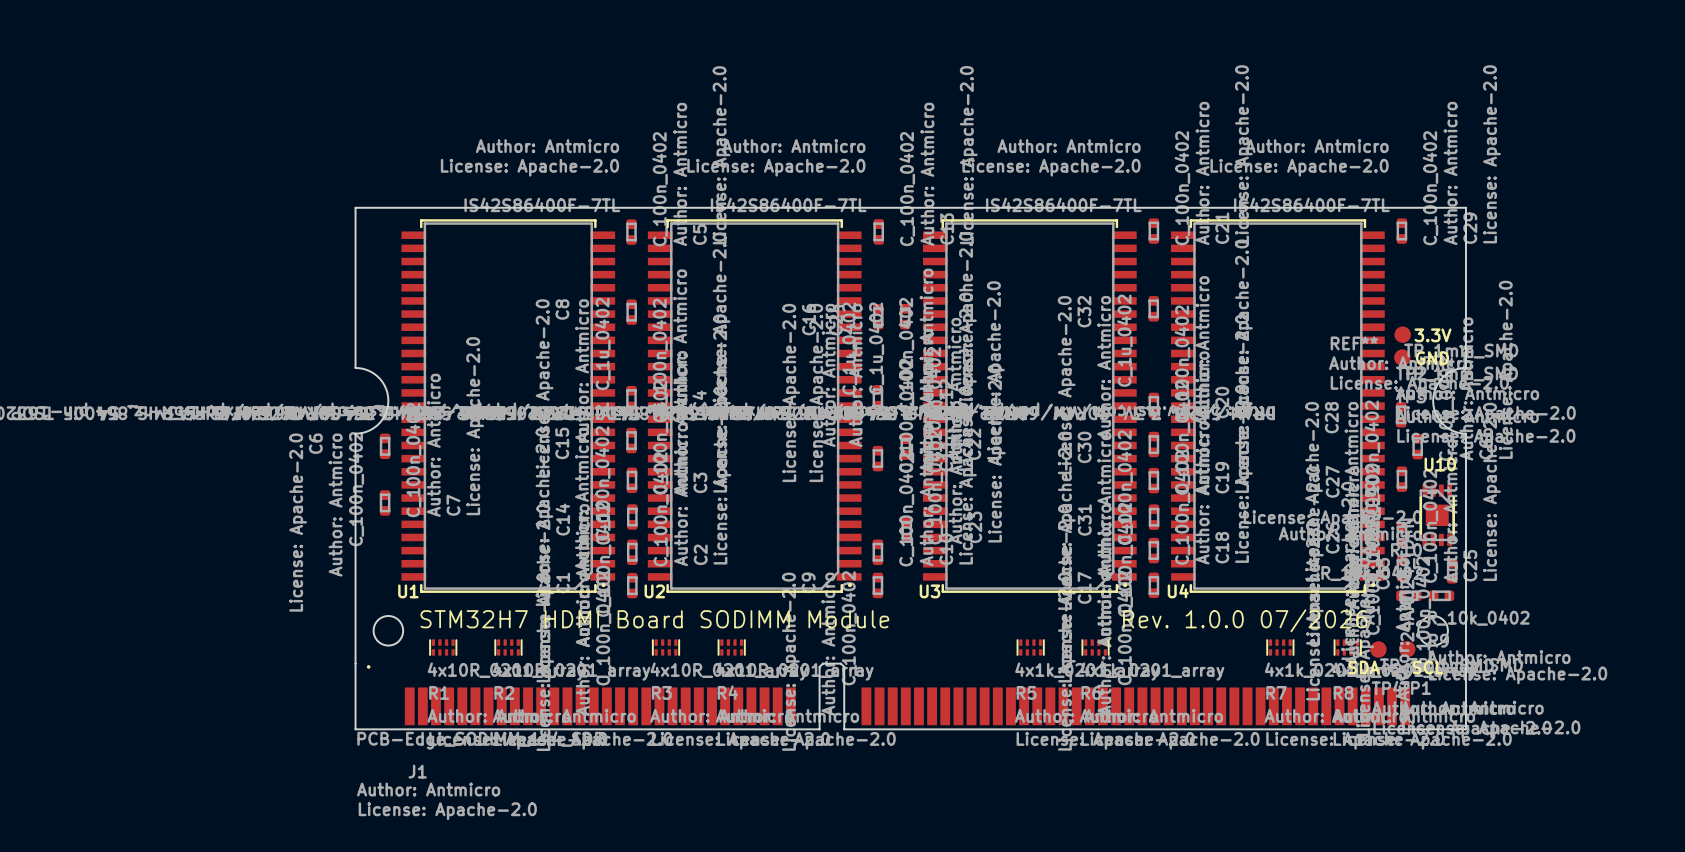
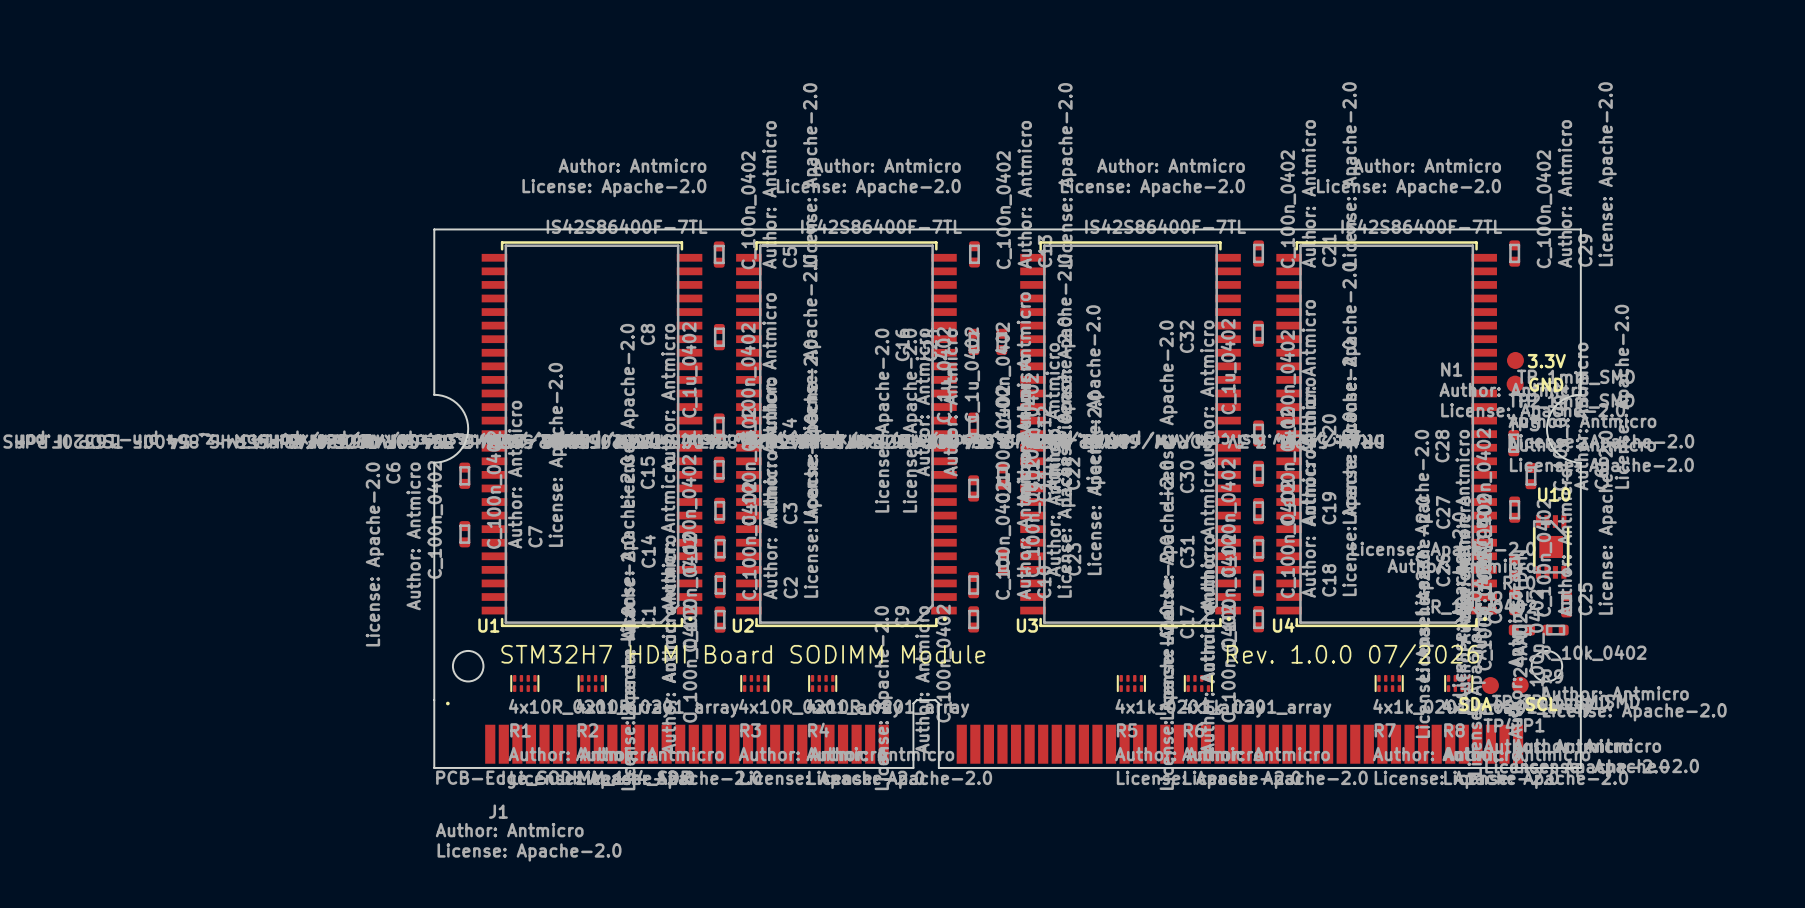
REF** name: REF** (1354, 343) -> N1 (1451, 369)

